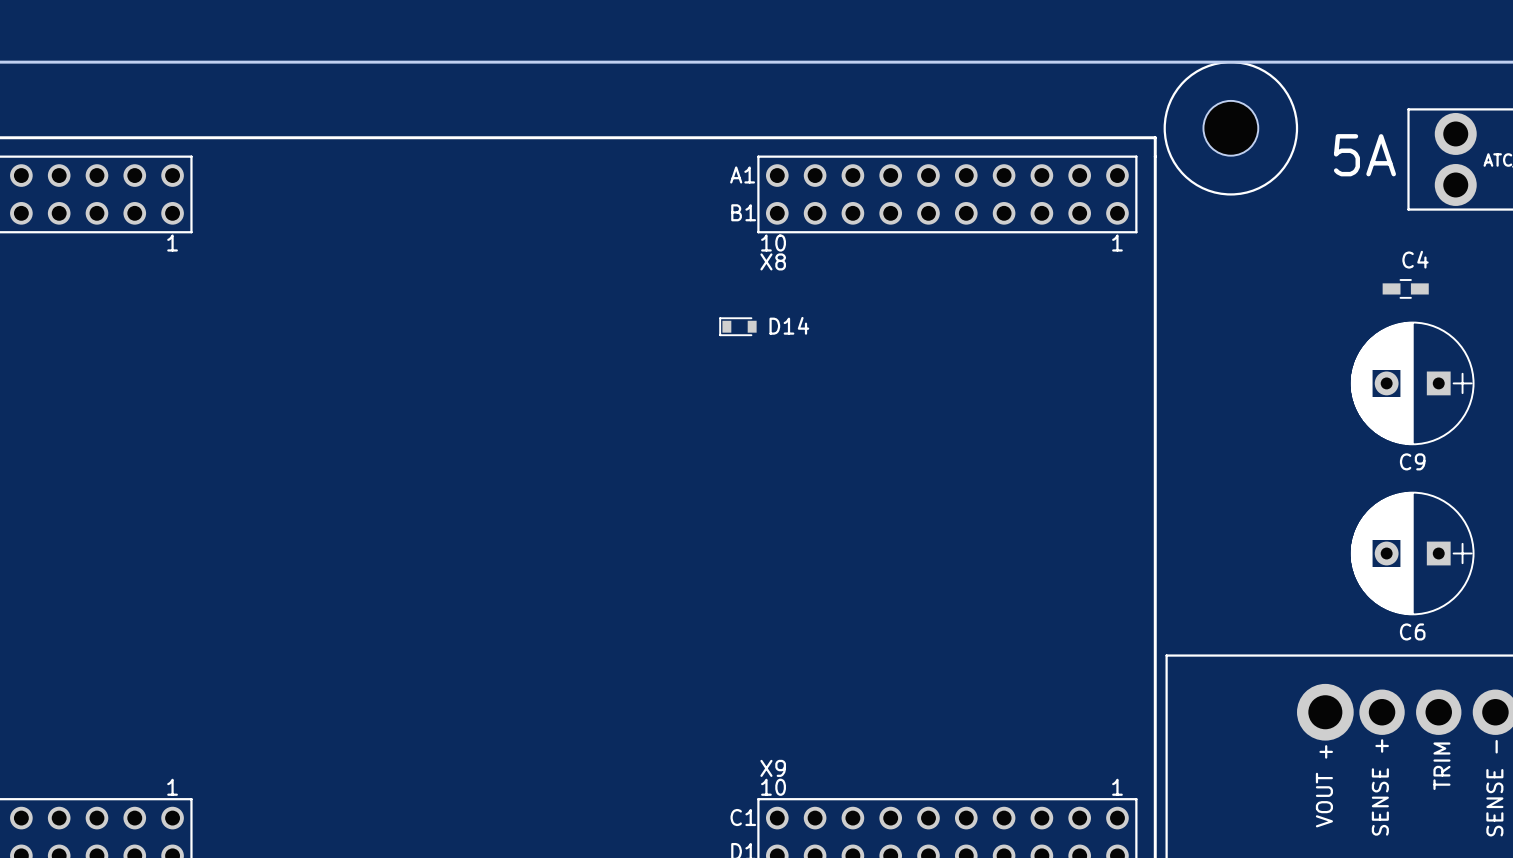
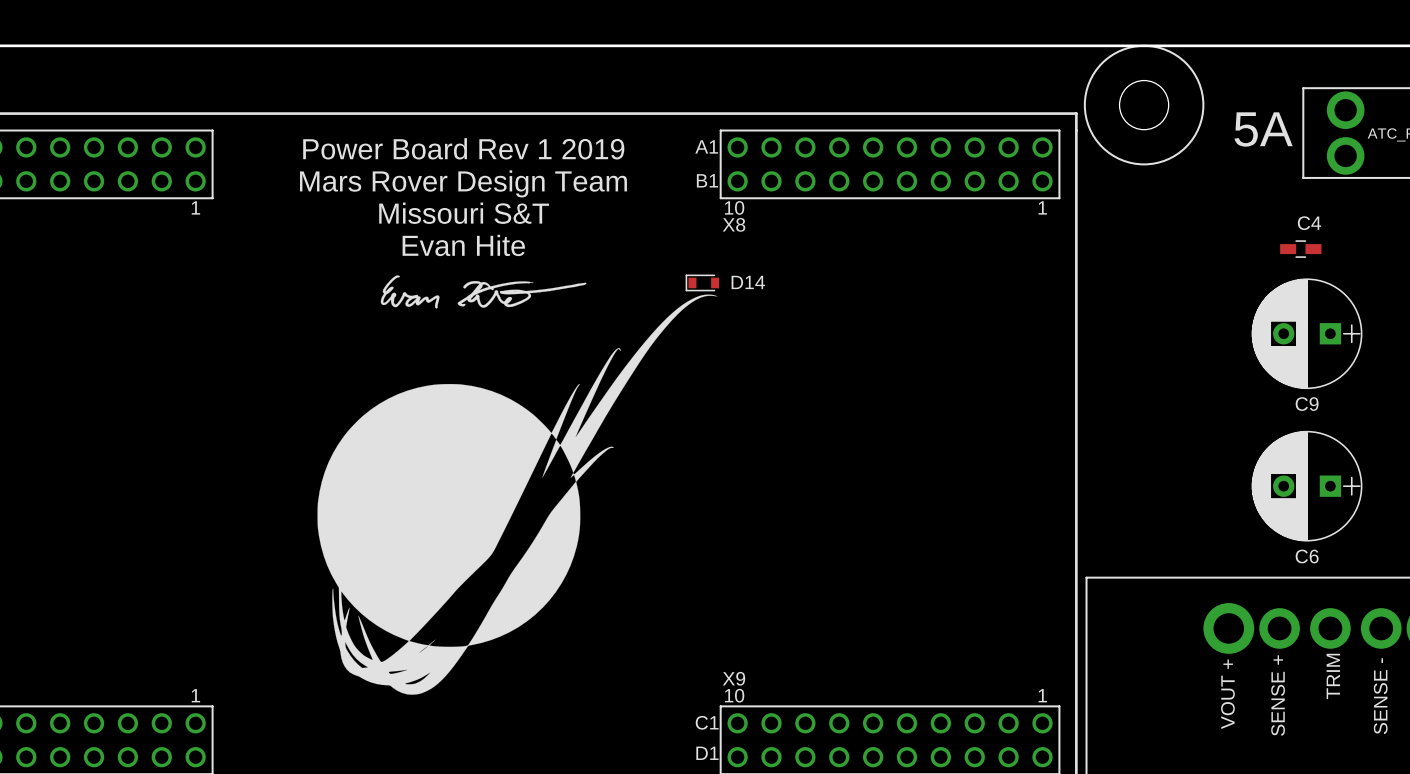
text: none -> Power Board Rev 1 2019 (463, 148)
text: none -> Mars Rover Design Team (463, 183)
text: none -> Missouri S&T (464, 213)
text: none -> Evan Hite (463, 245)
drawing: none -> [317, 275, 718, 695]

